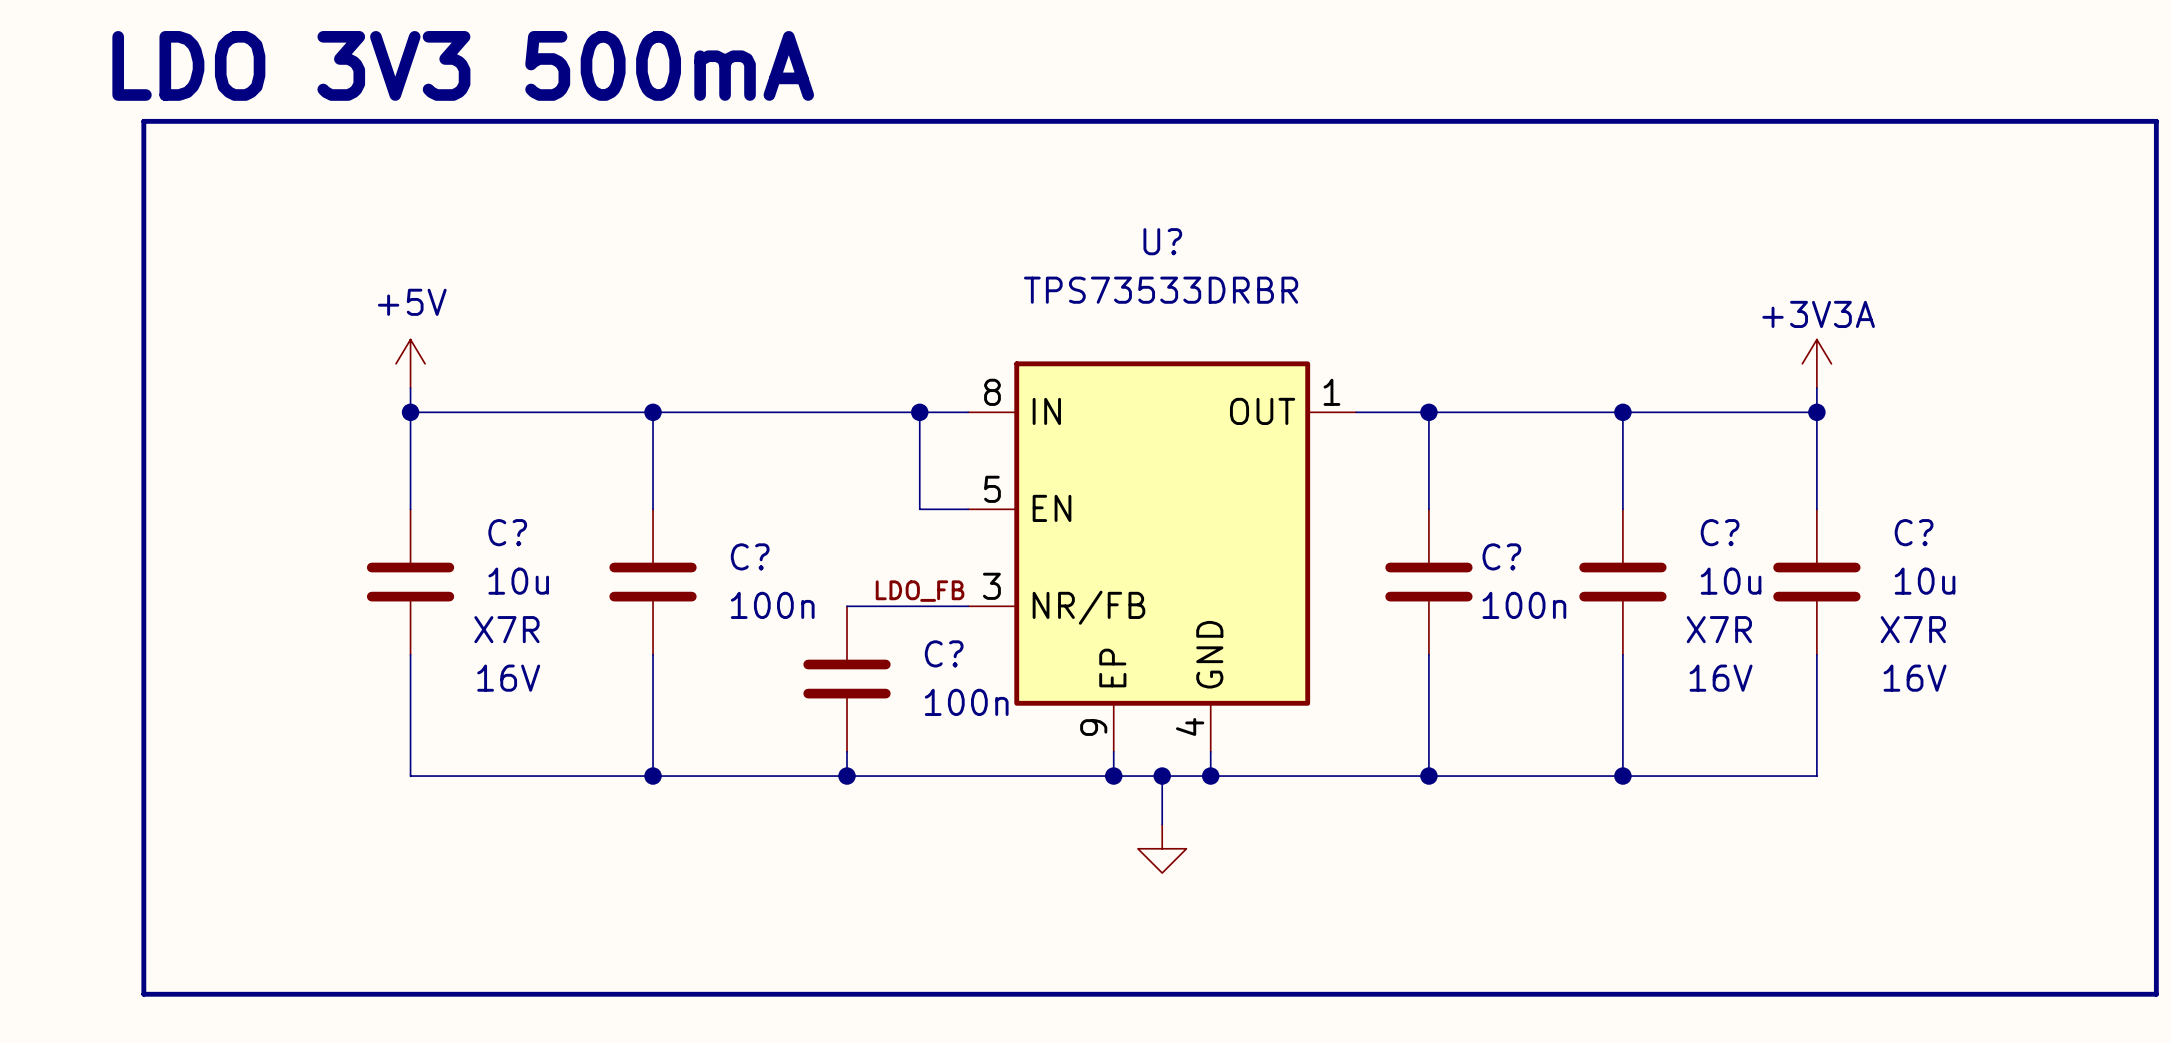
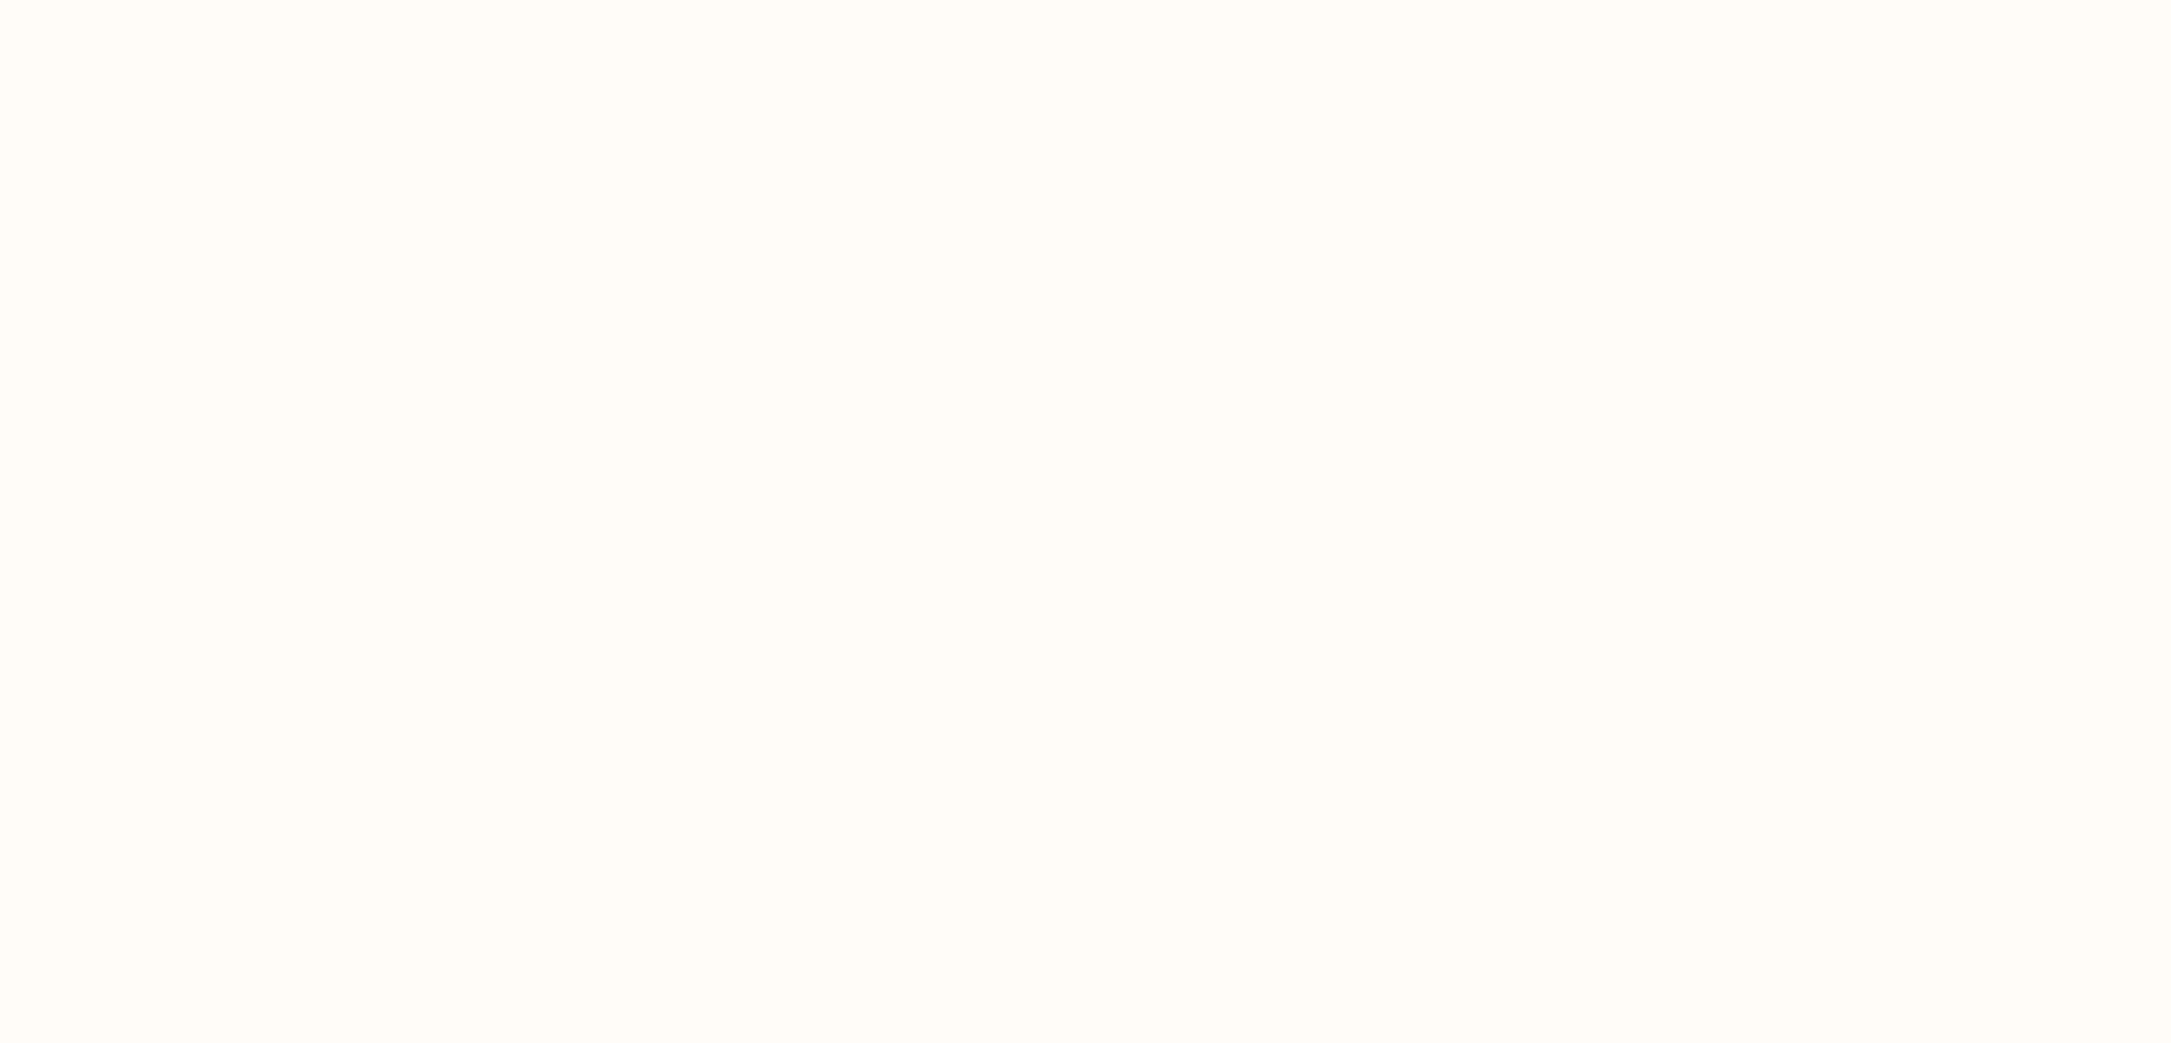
text: LDO 3V3 500mA (463, 65) -> none
line: (143, 121) (2156, 121) (2156, 994) (143, 994) (143, 121) -> none
power symbol: +5V (410, 363) -> none
power symbol: +3V3A (1816, 363) -> none
wire: (410, 388) (410, 509) -> none
wire: (1816, 388) (1816, 509) -> none
wire: (410, 412) (968, 412) -> none
junction: (410, 412) -> none
wire: (653, 412) (653, 509) -> none
junction: (653, 412) -> none
wire: (919, 412) (919, 509) (968, 509) -> none
junction: (919, 412) -> none
wire: (1356, 412) (1816, 412) -> none
wire: (1428, 412) (1428, 509) -> none
junction: (1428, 412) -> none
wire: (1622, 412) (1622, 509) -> none
junction: (1622, 412) -> none
junction: (1816, 412) -> none
U?: TPS73533DRBR (1162, 556) -> none
C?: 10u (410, 582) -> none
C?: 100n (653, 582) -> none
C?: 100n (1428, 582) -> none
C?: 10u (1622, 582) -> none
C?: 10u (1816, 582) -> none
label: LDO_FB (920, 591) -> none
wire: (847, 606) (968, 606) -> none
wire: (410, 654) (410, 776) (1816, 776) (1816, 654) -> none
wire: (653, 654) (653, 776) -> none
wire: (1428, 654) (1428, 776) -> none
wire: (1622, 654) (1622, 776) -> none
C?: 100n (847, 679) -> none
wire: (847, 751) (847, 776) -> none
wire: (1113, 751) (1113, 776) -> none
wire: (1210, 751) (1210, 776) -> none
junction: (653, 776) -> none
junction: (847, 776) -> none
junction: (1113, 776) -> none
wire: (1162, 776) (1162, 824) -> none
junction: (1162, 776) -> none
junction: (1210, 776) -> none
junction: (1428, 776) -> none
junction: (1622, 776) -> none
power symbol: (1162, 848) -> none

